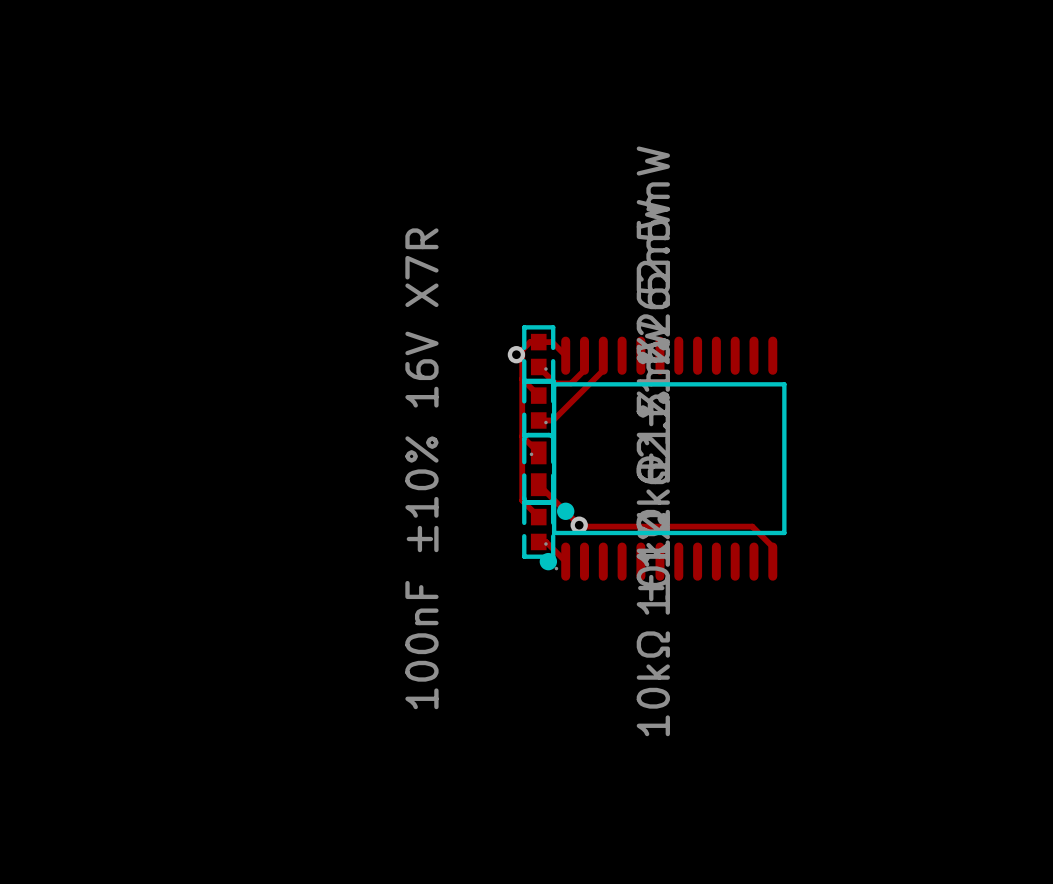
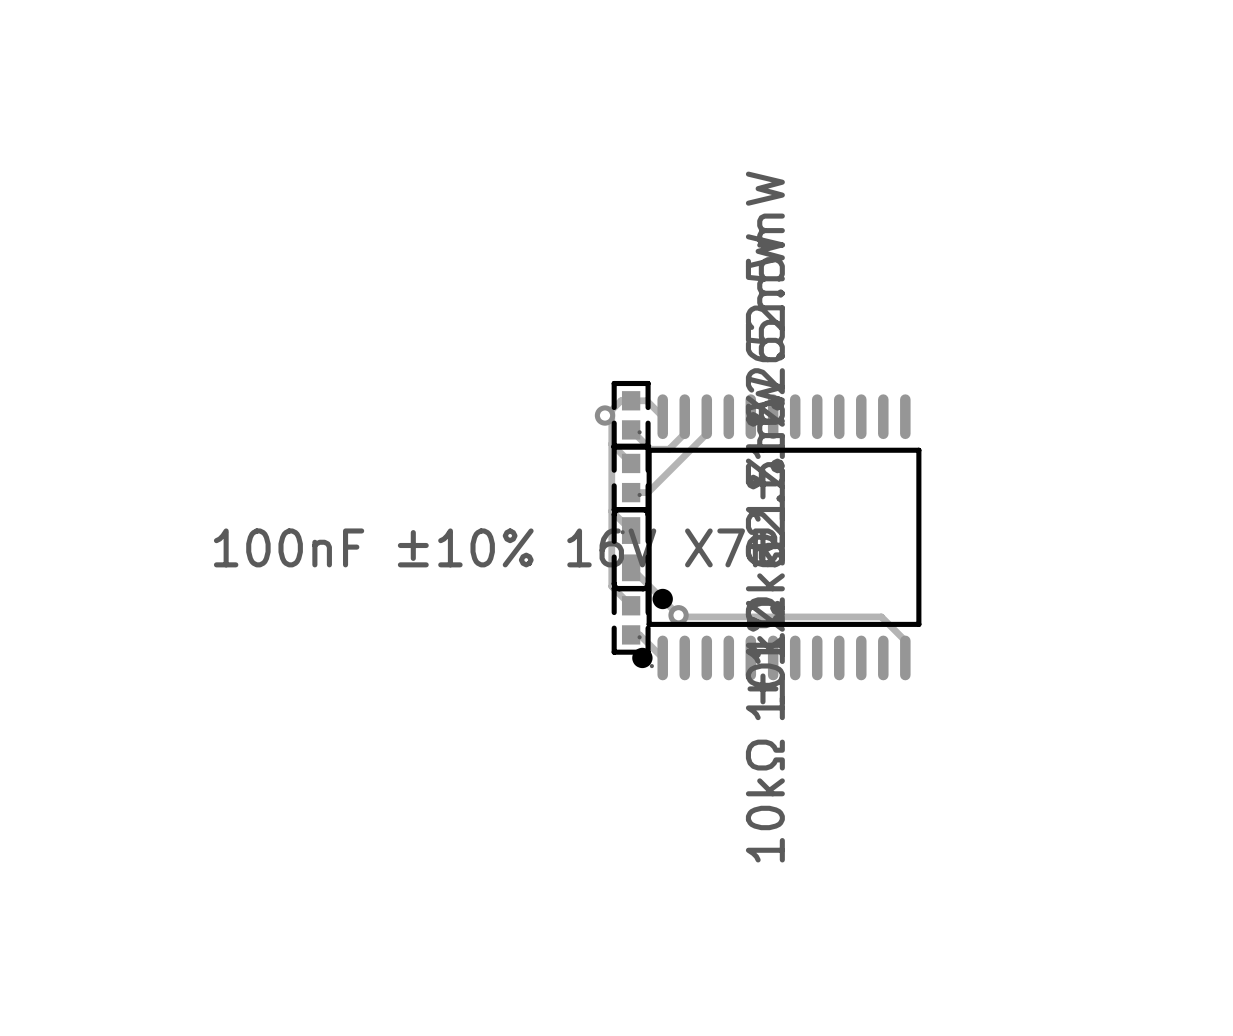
part value rotation: 0° (421, 468) -> 90° clockwise (495, 547)

